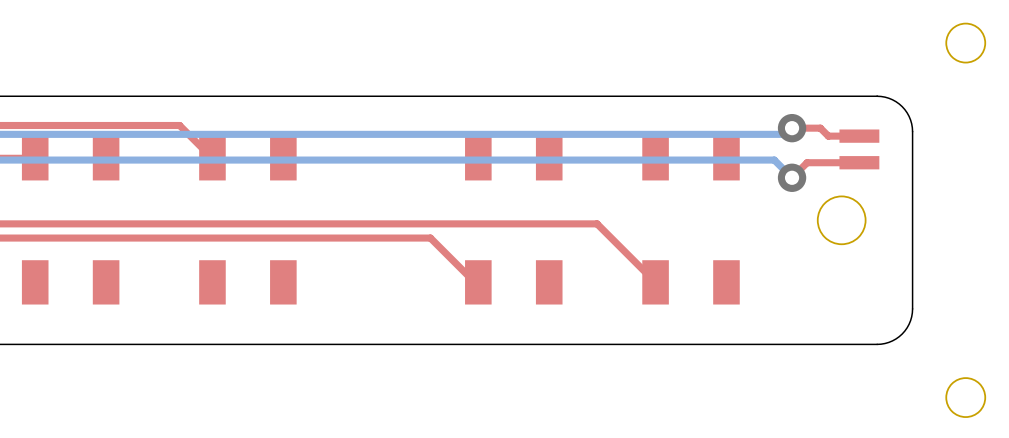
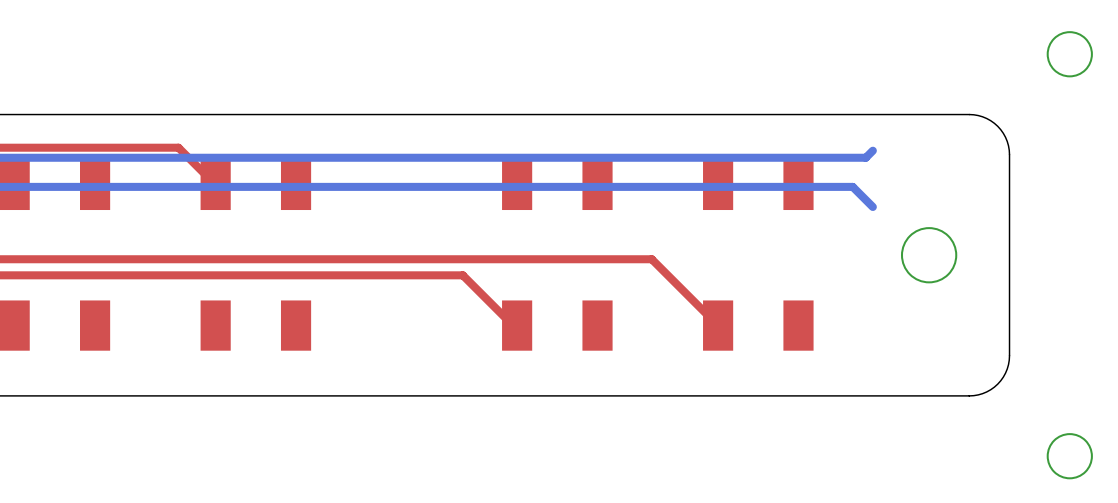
top track: (792, 128) (820, 128) (828, 136) (859, 136) -> none
via: (792, 128) -> none
part: (859, 149) -> none
top track: (859, 162) (807, 162) (792, 177) -> none
via: (792, 177) -> none

